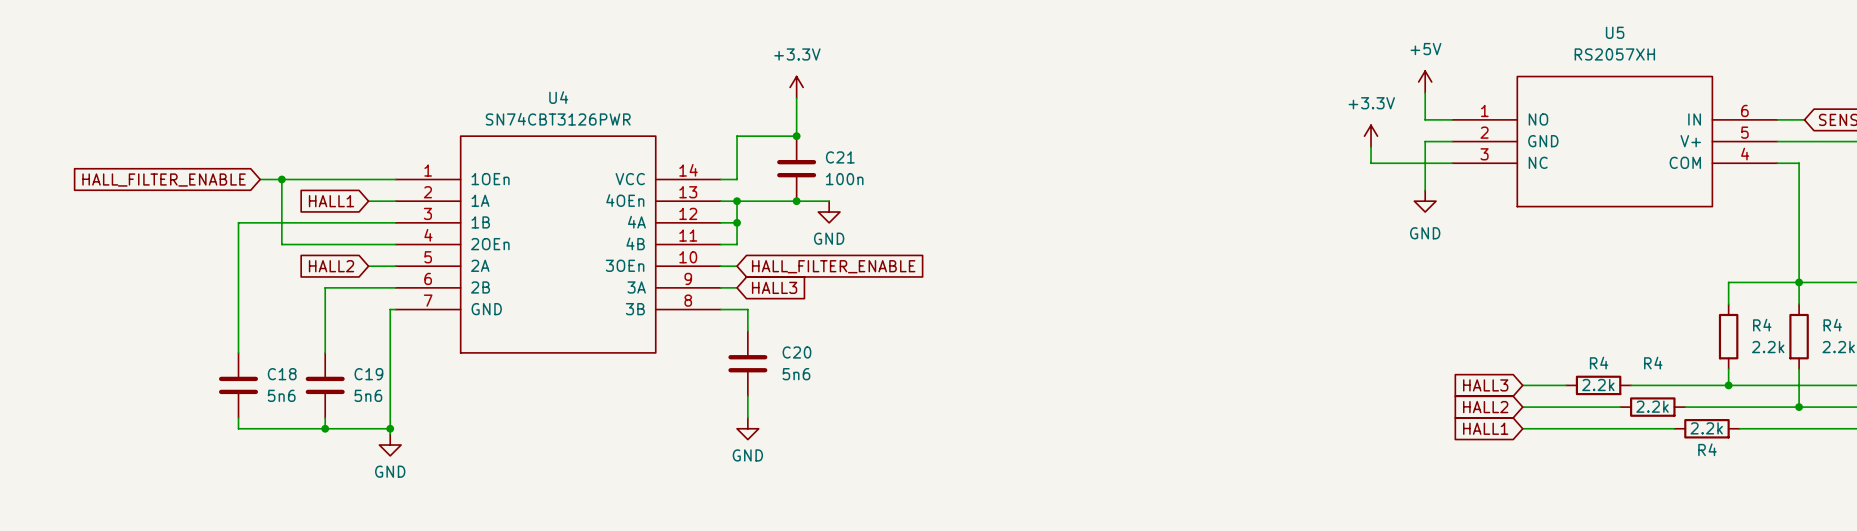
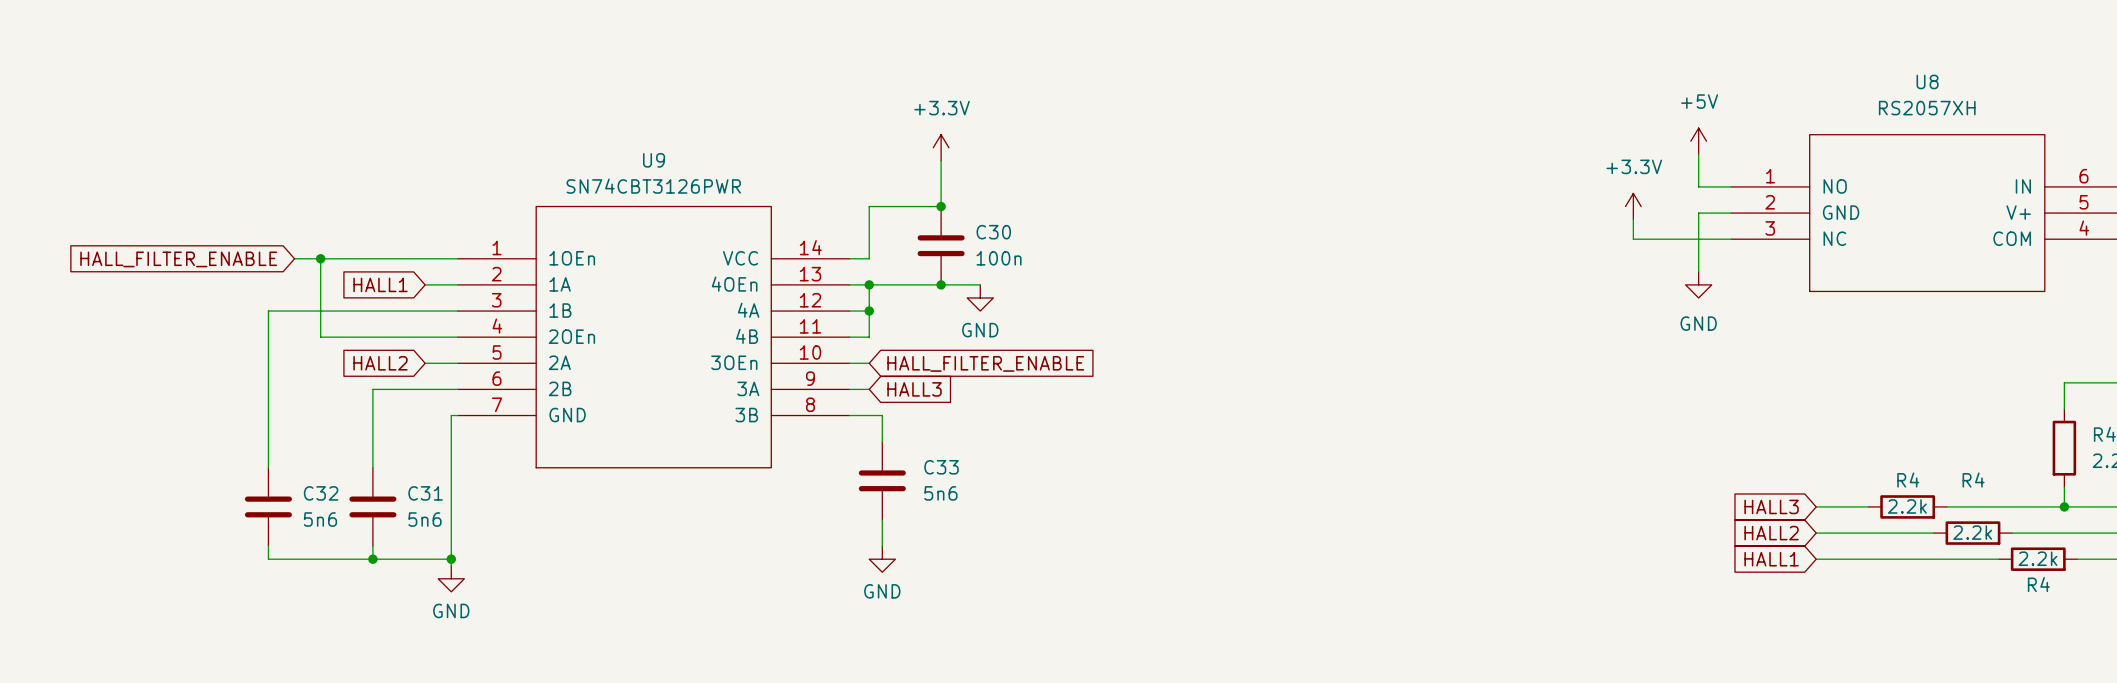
U5 name: U5 (1615, 32) -> U8 (1927, 81)
U4 name: U4 (558, 97) -> U9 (654, 160)
C21 name: C21 (840, 157) -> C30 (993, 232)
C20 name: C20 (796, 352) -> C33 (941, 467)
C18 name: C18 (282, 374) -> C32 (321, 493)
C19 name: C19 (368, 374) -> C31 (425, 493)

